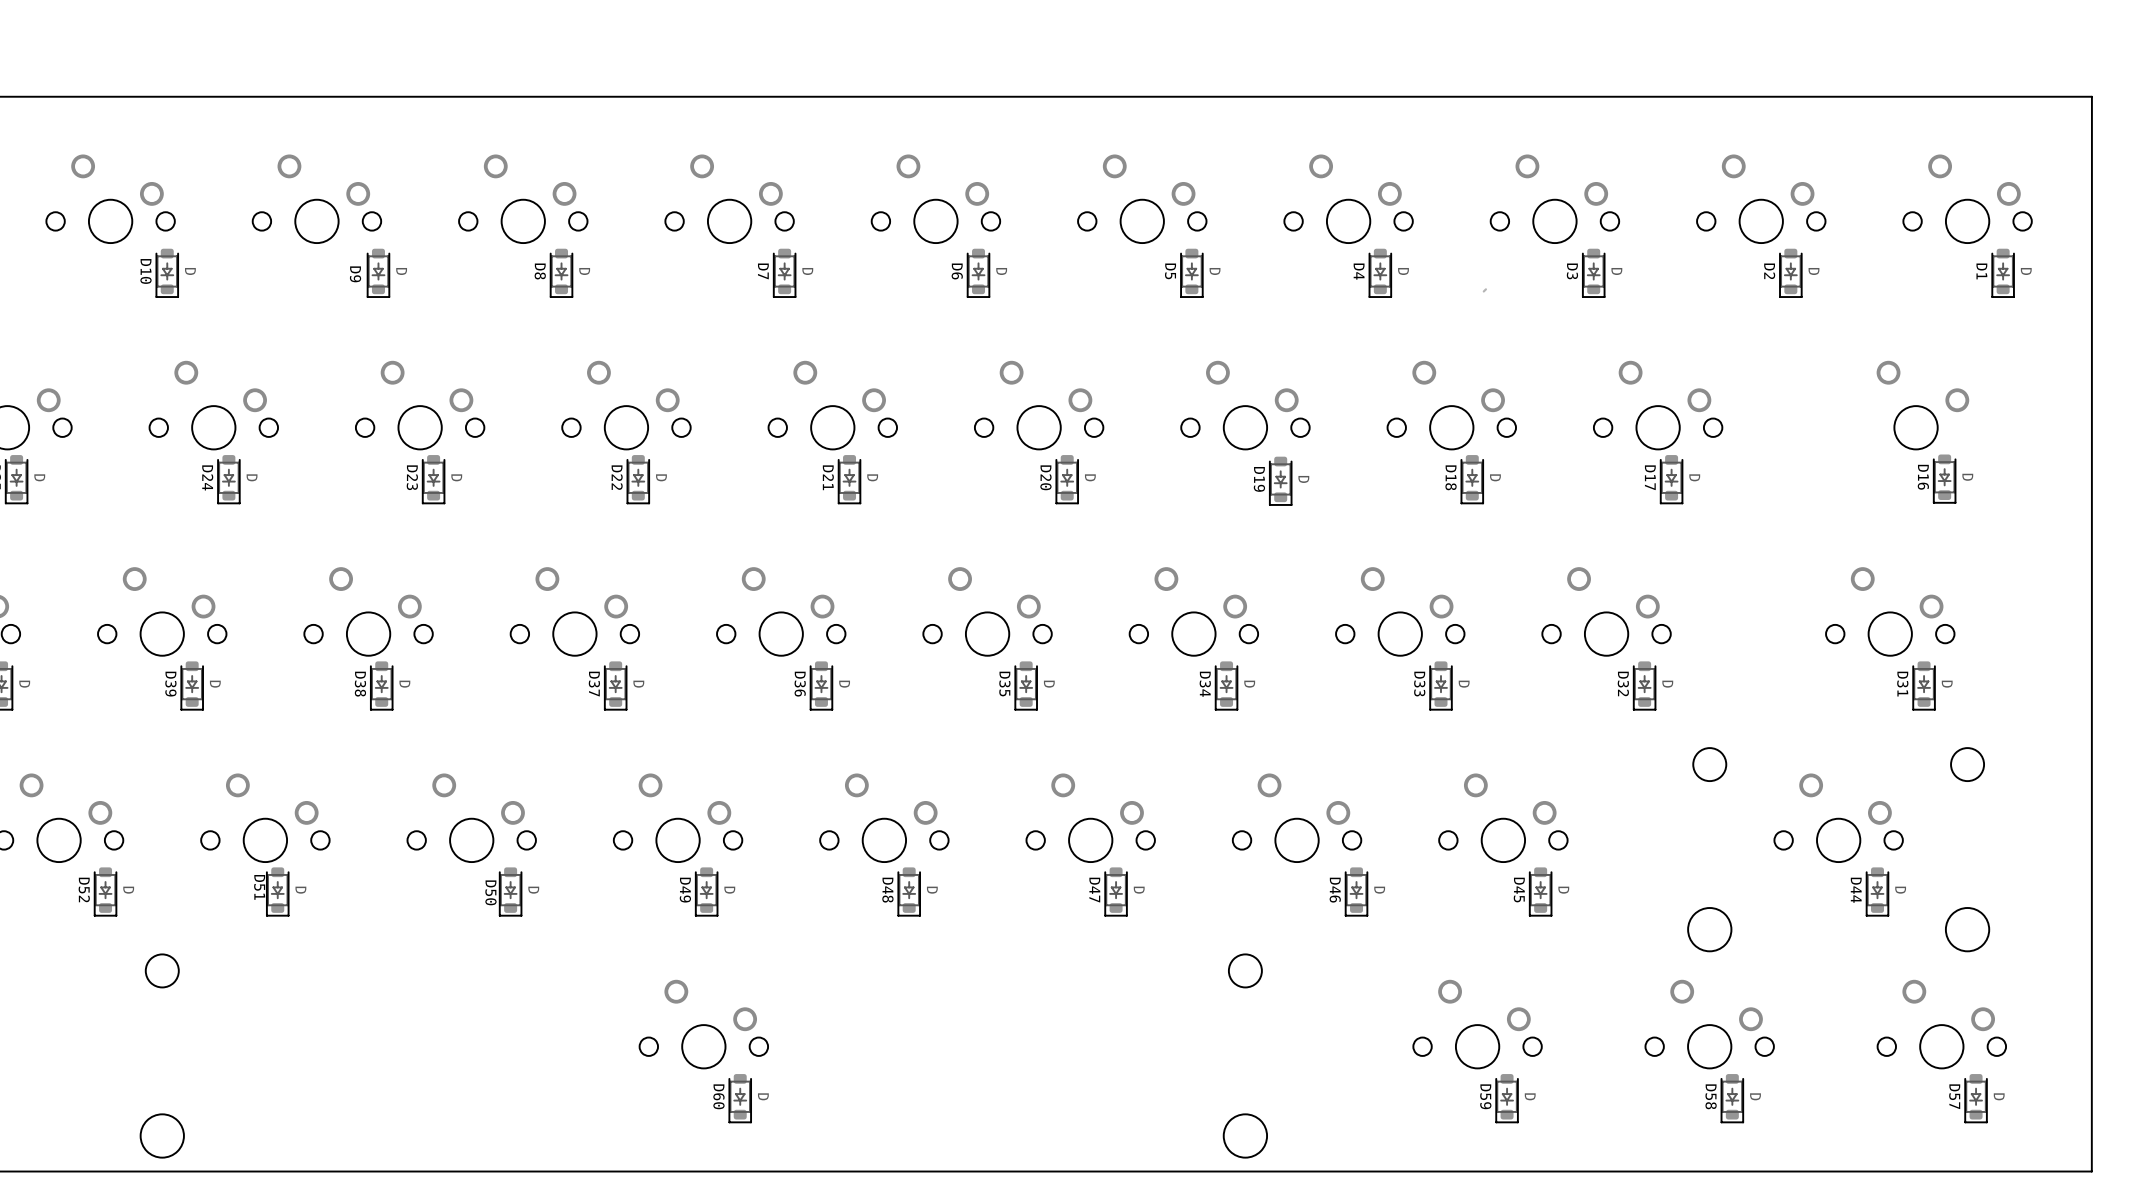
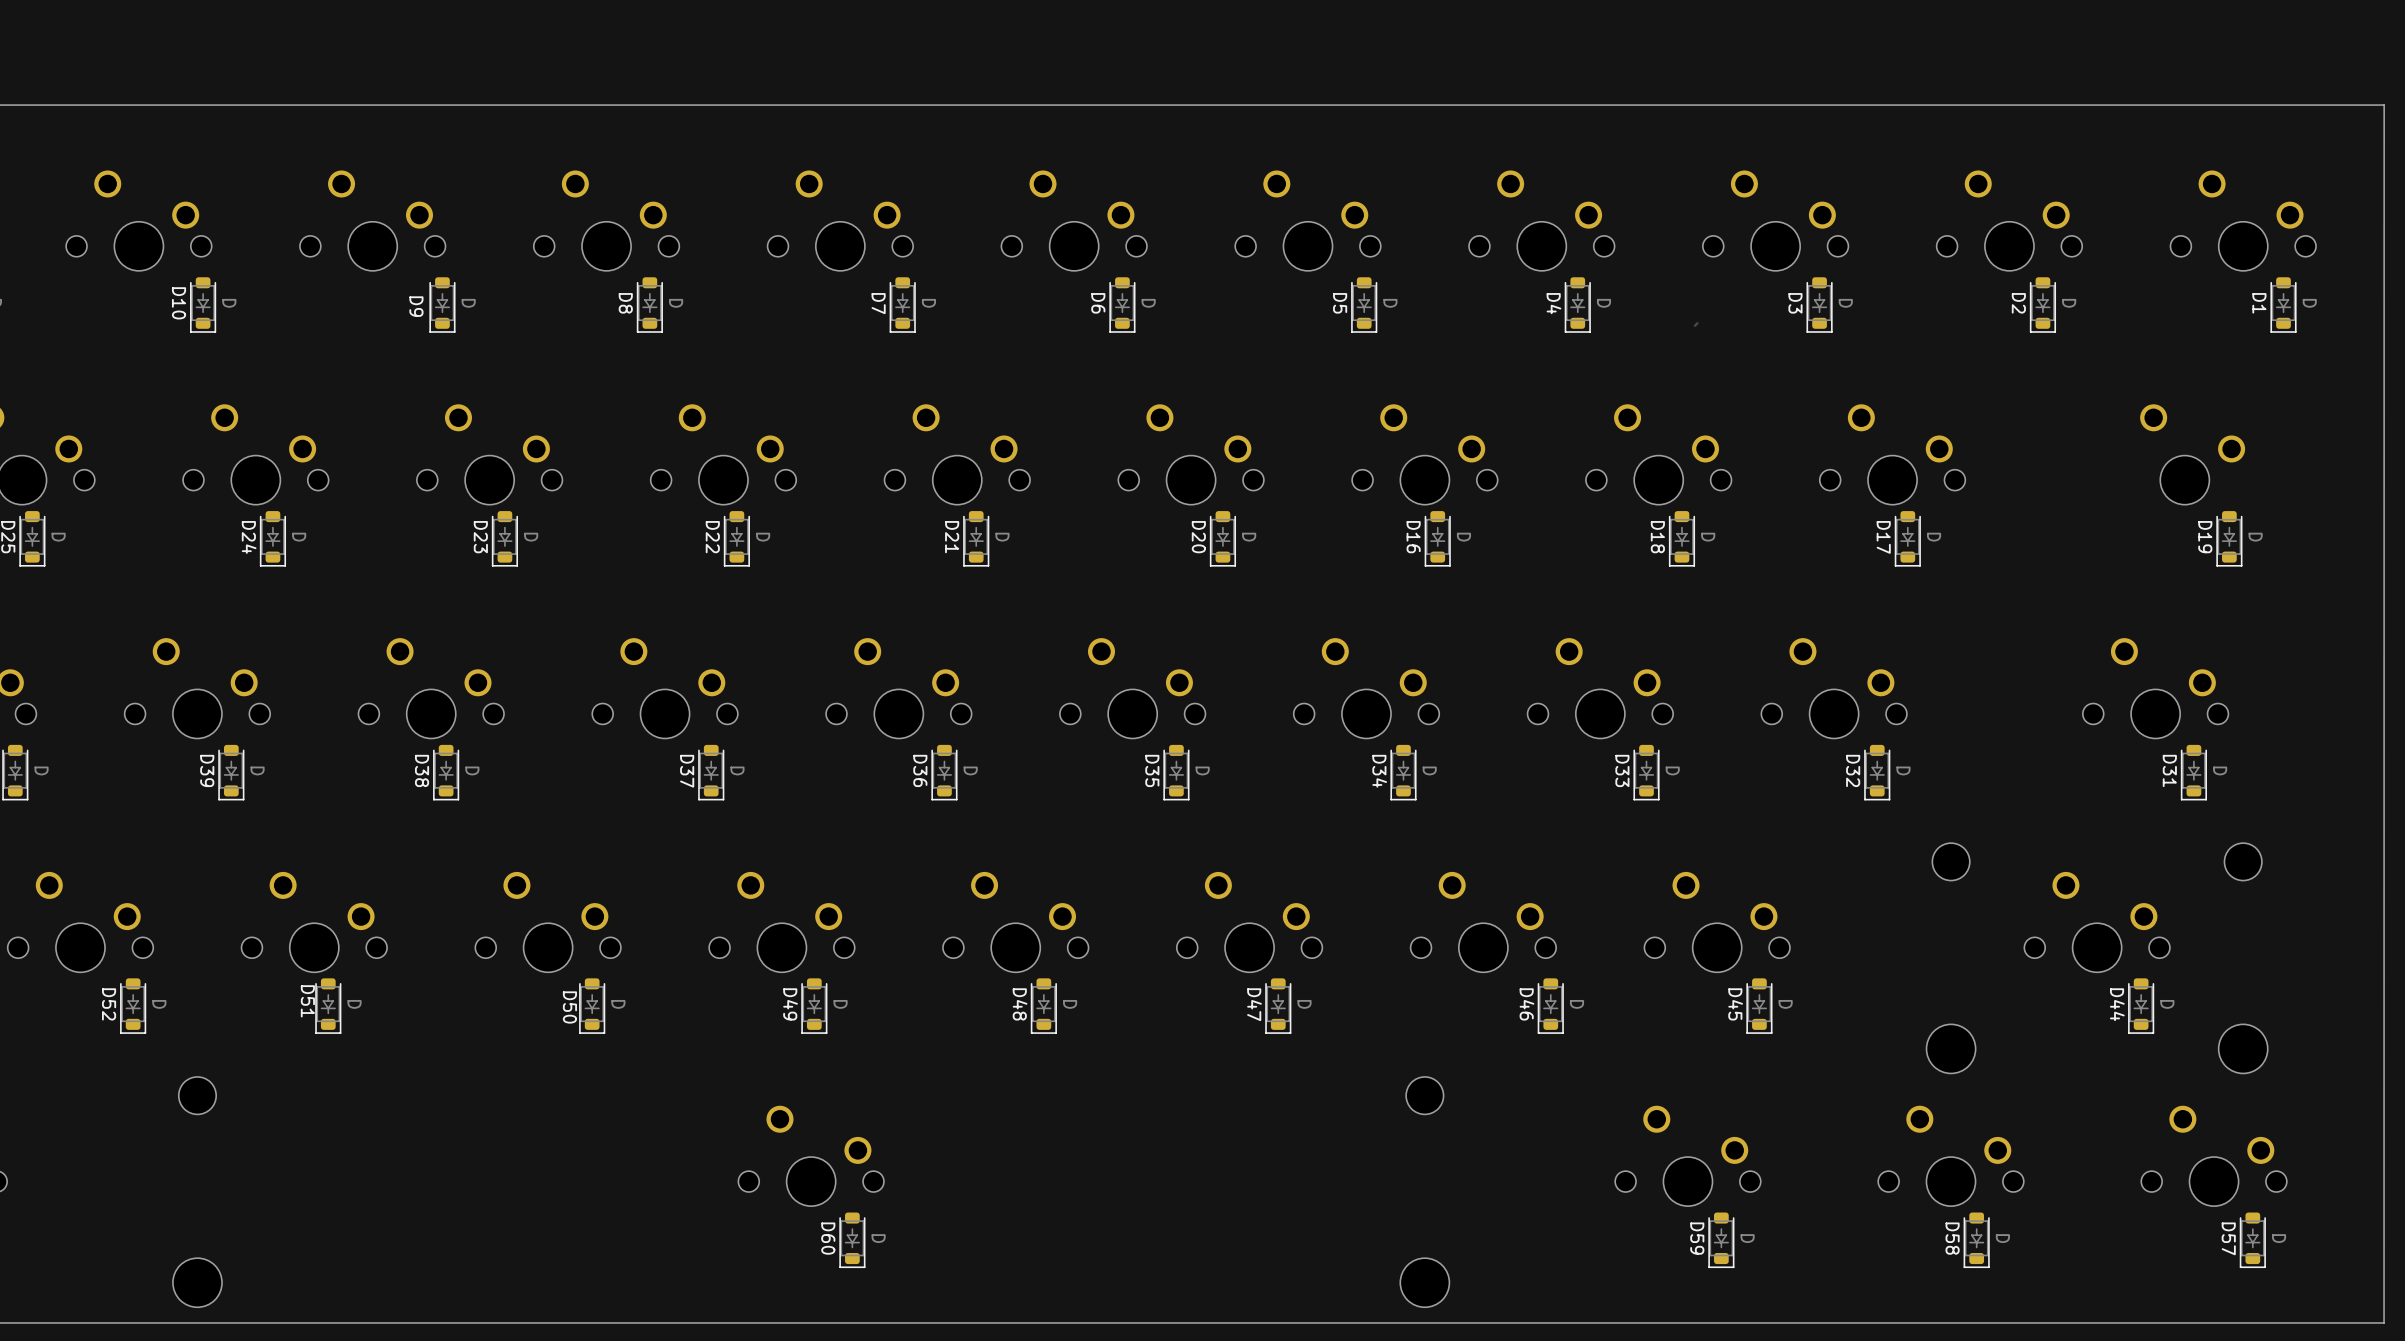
D16 position: (1944, 478) -> (1437, 538)
D19 position: (1280, 481) -> (2229, 538)

